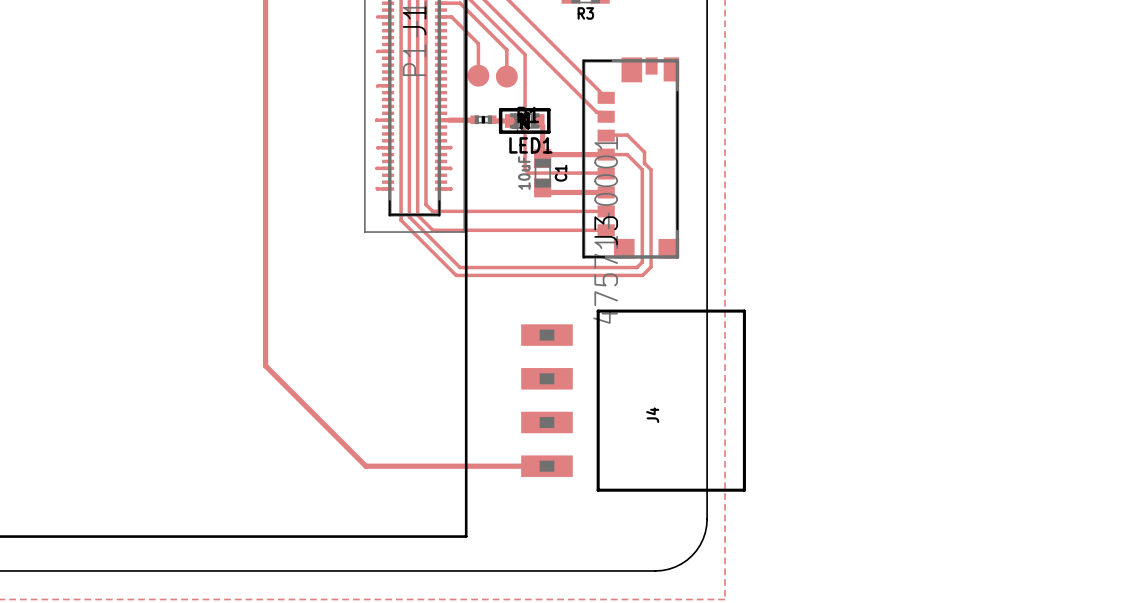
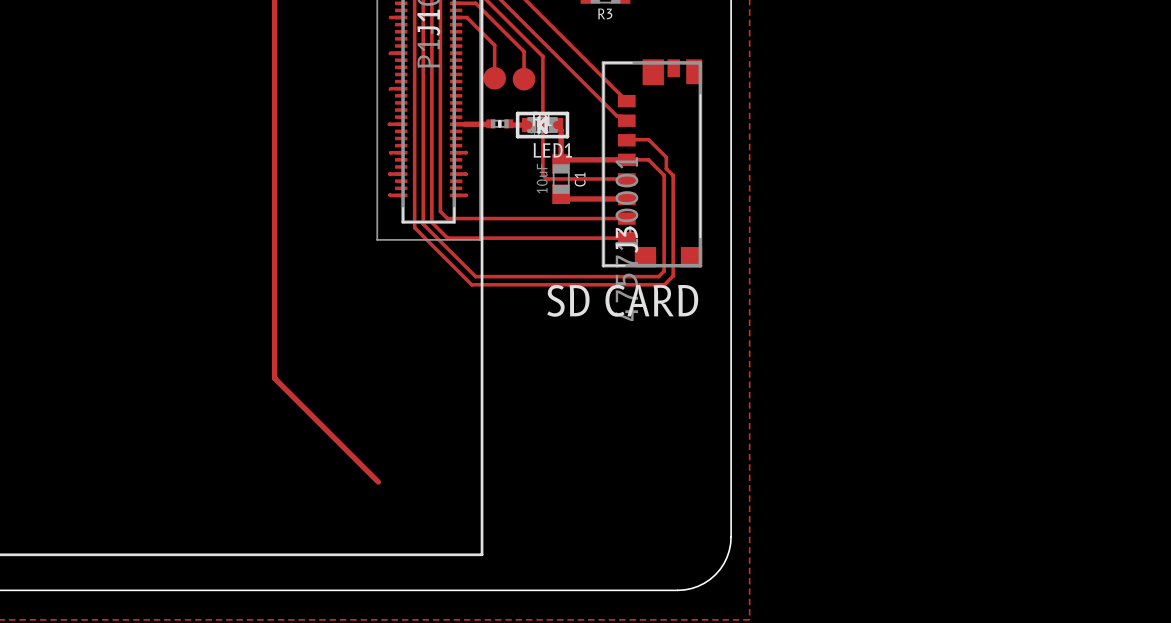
text: none -> SD CARD (622, 300)
J4: (633, 400) -> none
top track: (365, 466) (546, 466) -> none

